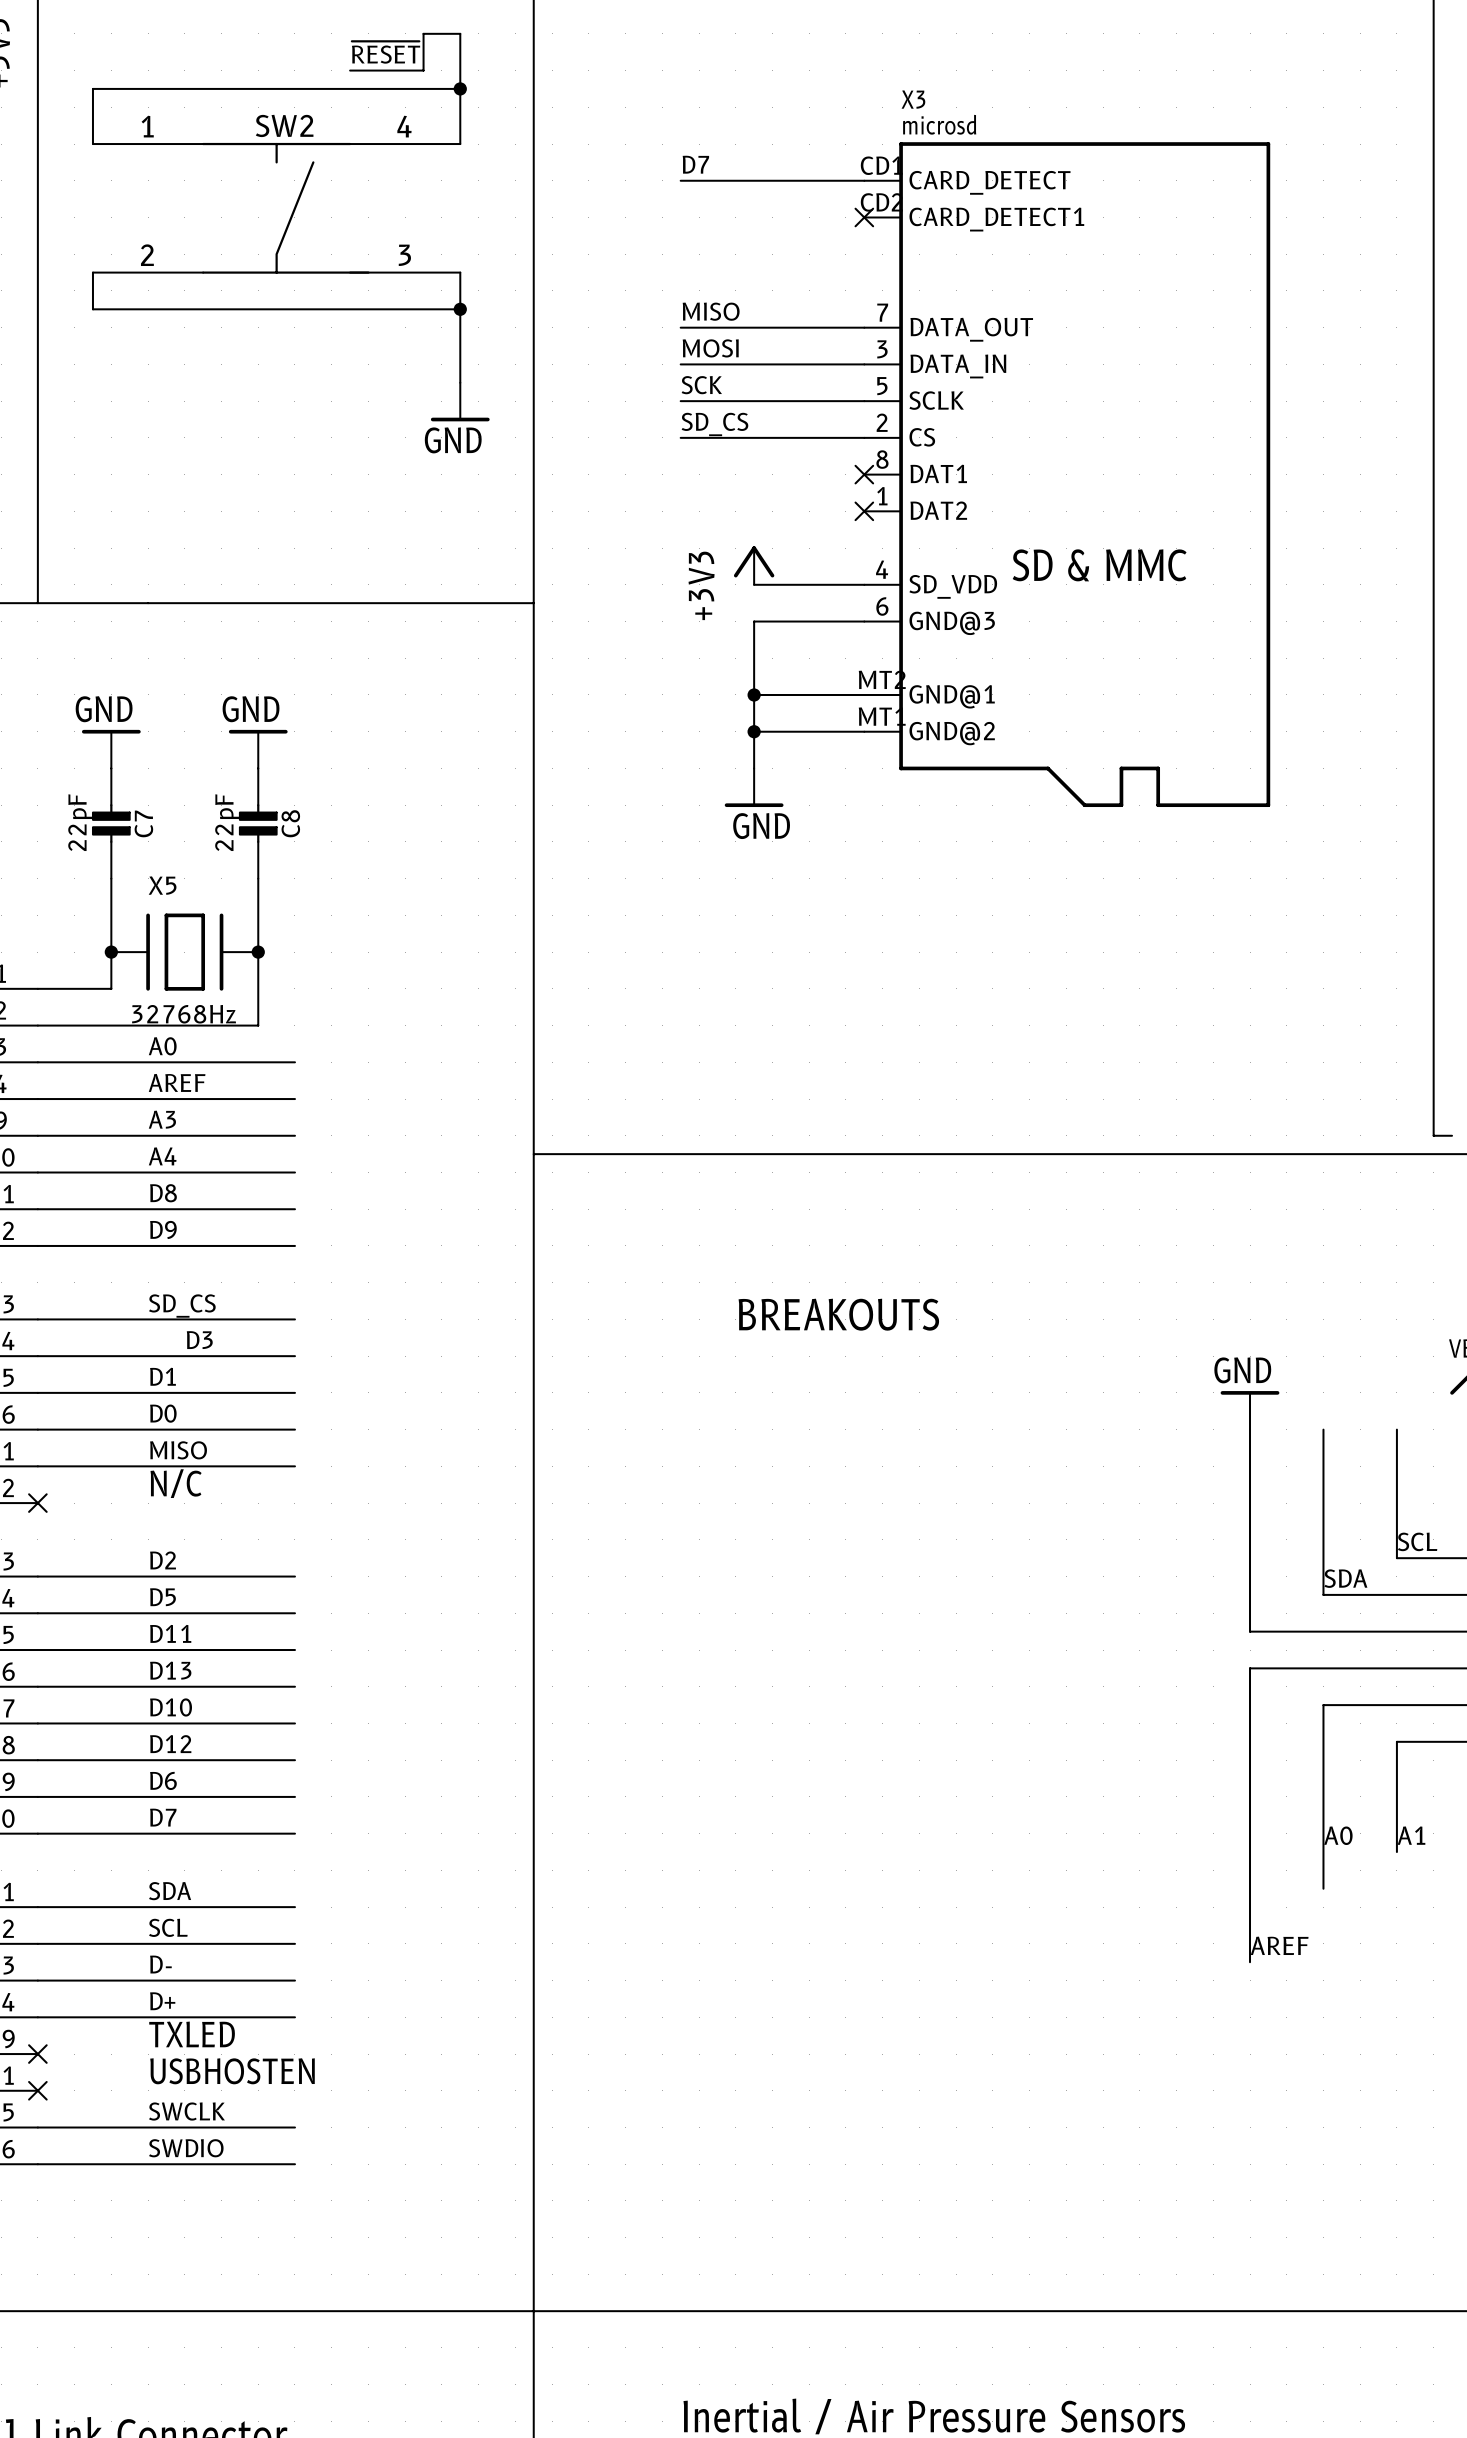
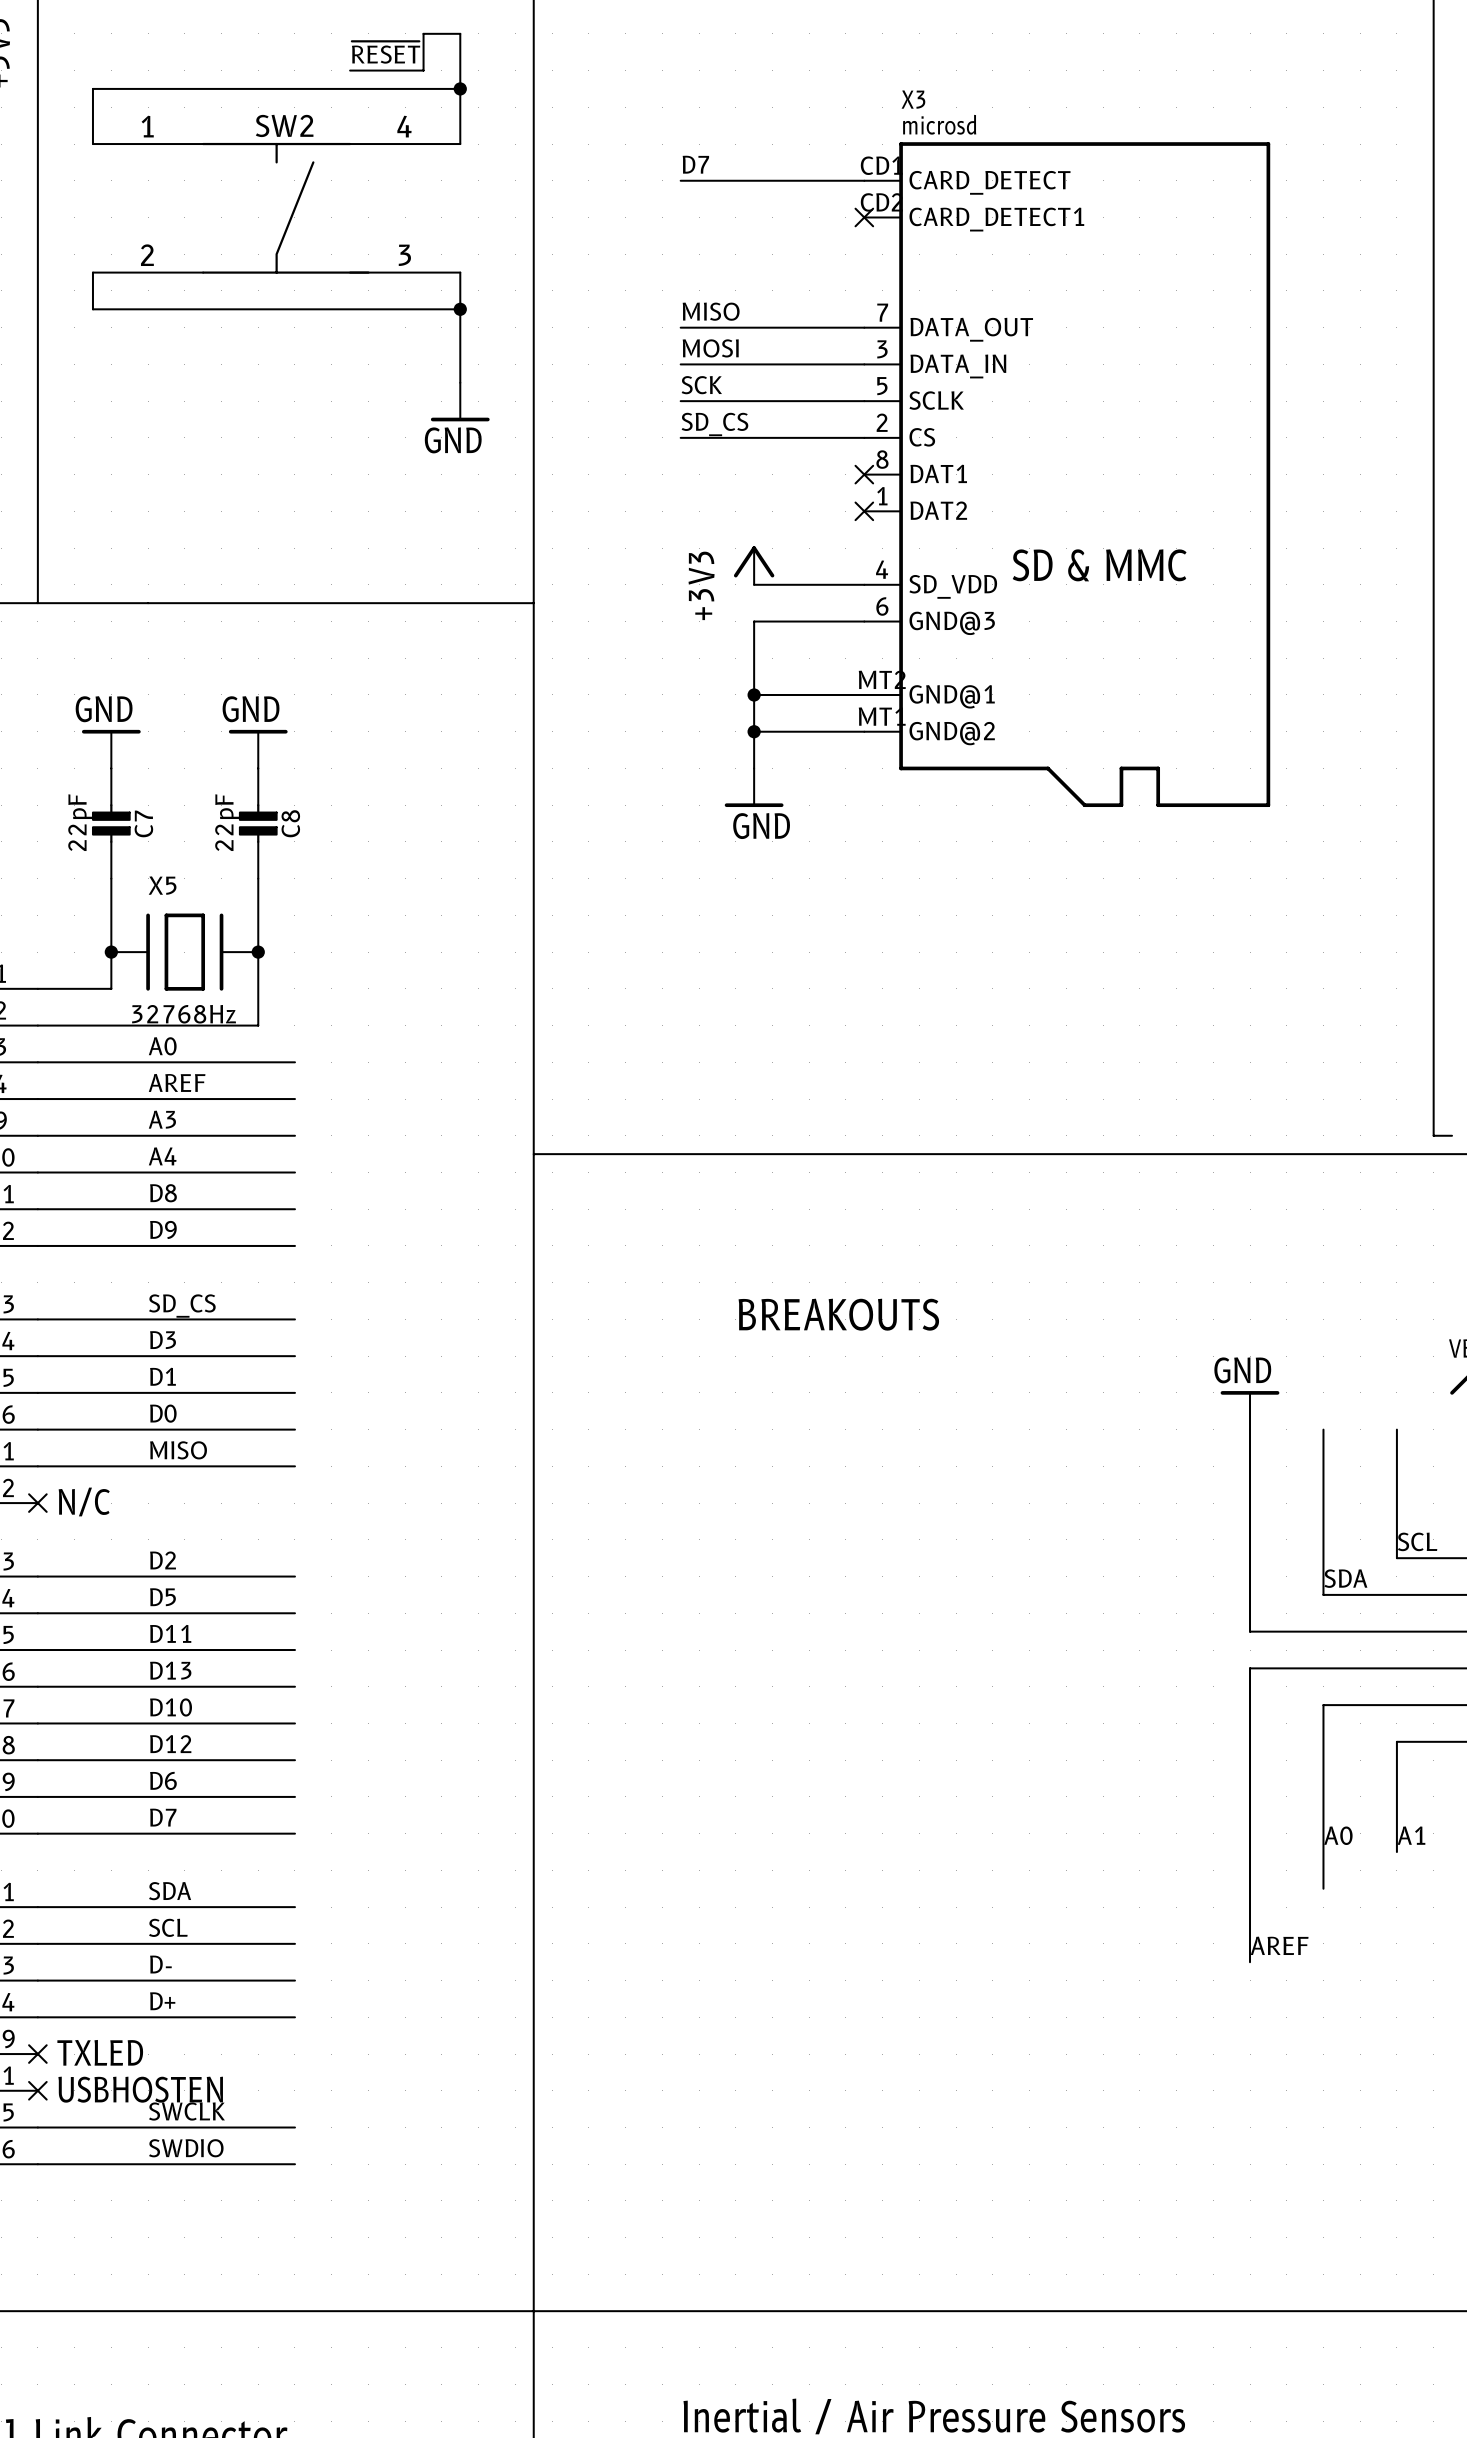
label position: D3 (199, 1340) -> D3 (163, 1340)
text position: N/C (176, 1483) -> N/C (84, 1502)
text position: TXLED (192, 2034) -> TXLED (100, 2052)
text position: USBHOSTEN (232, 2071) -> USBHOSTEN (140, 2089)

